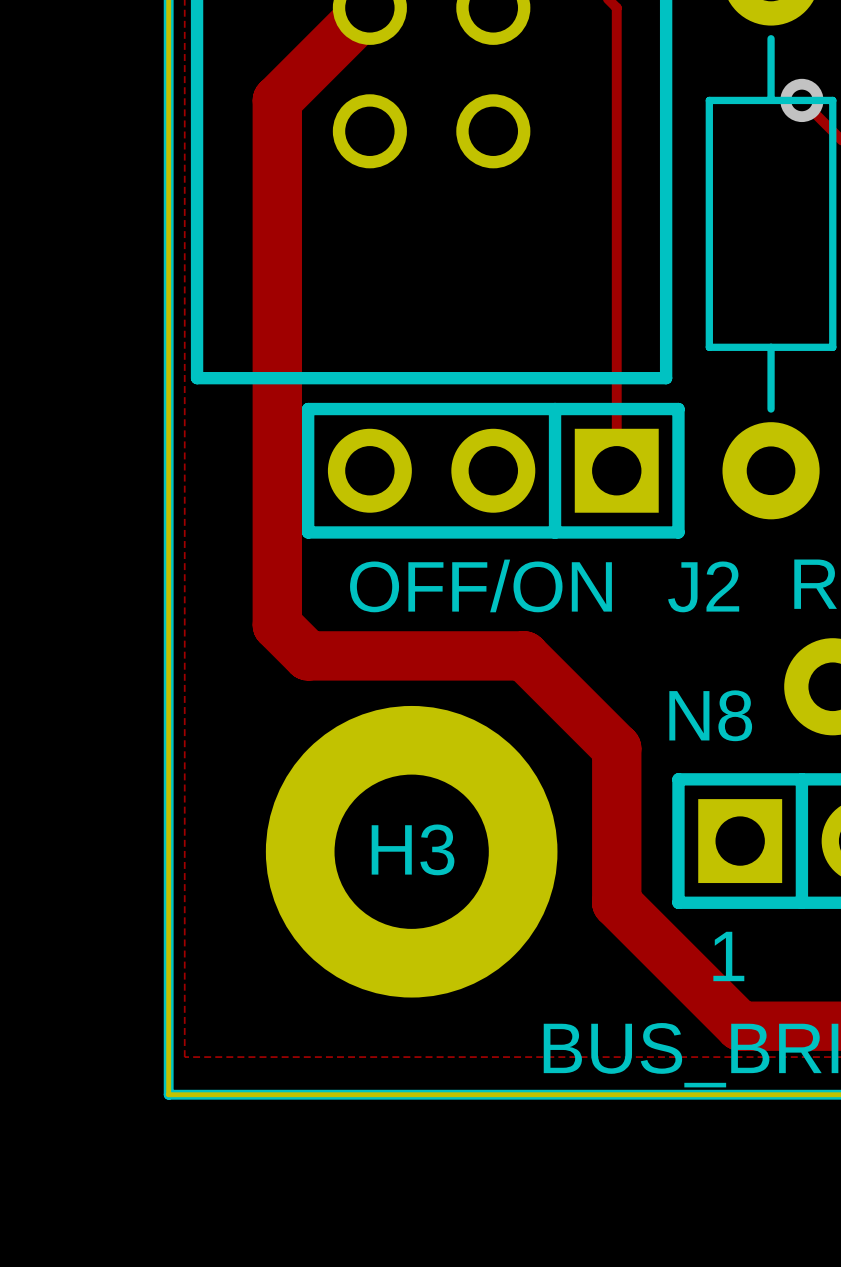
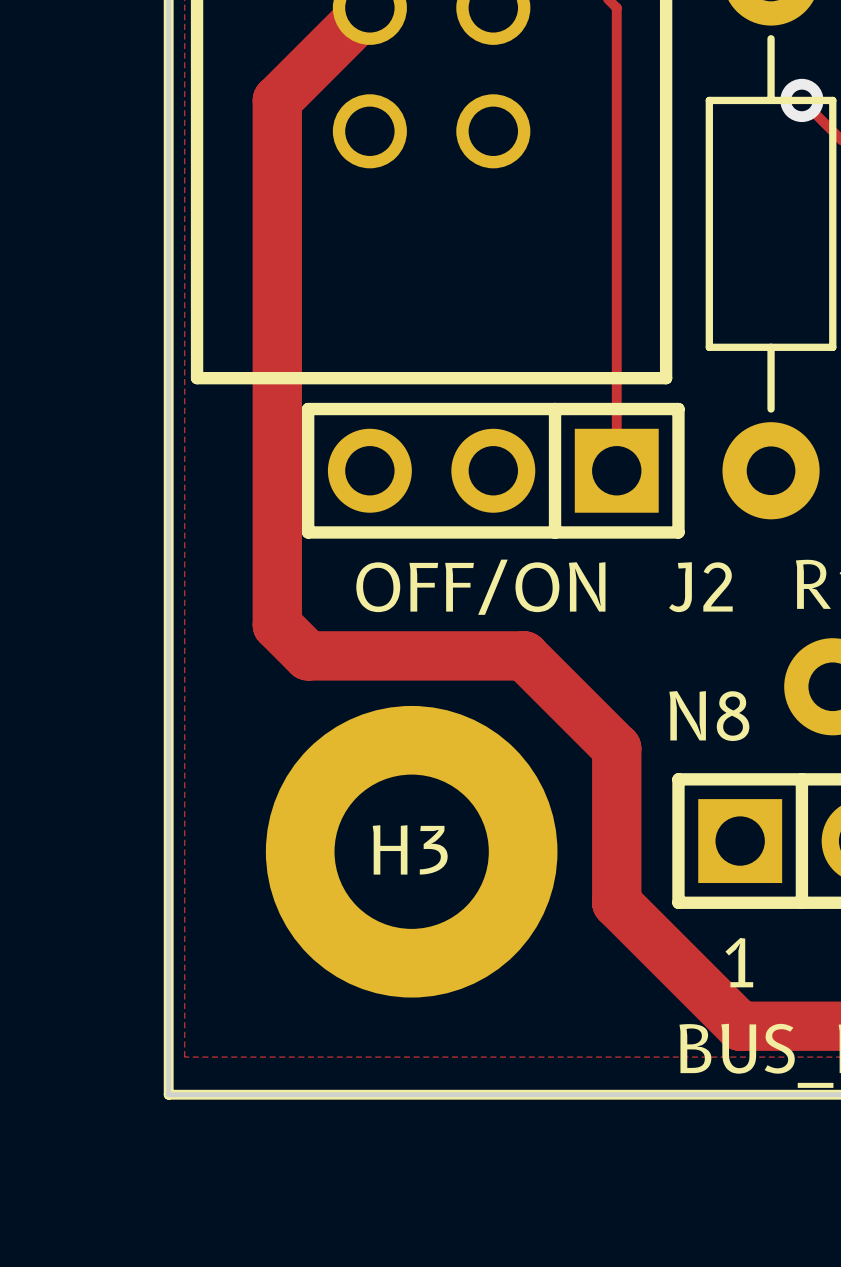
text position: 1 (728, 956) -> 1 (739, 962)

